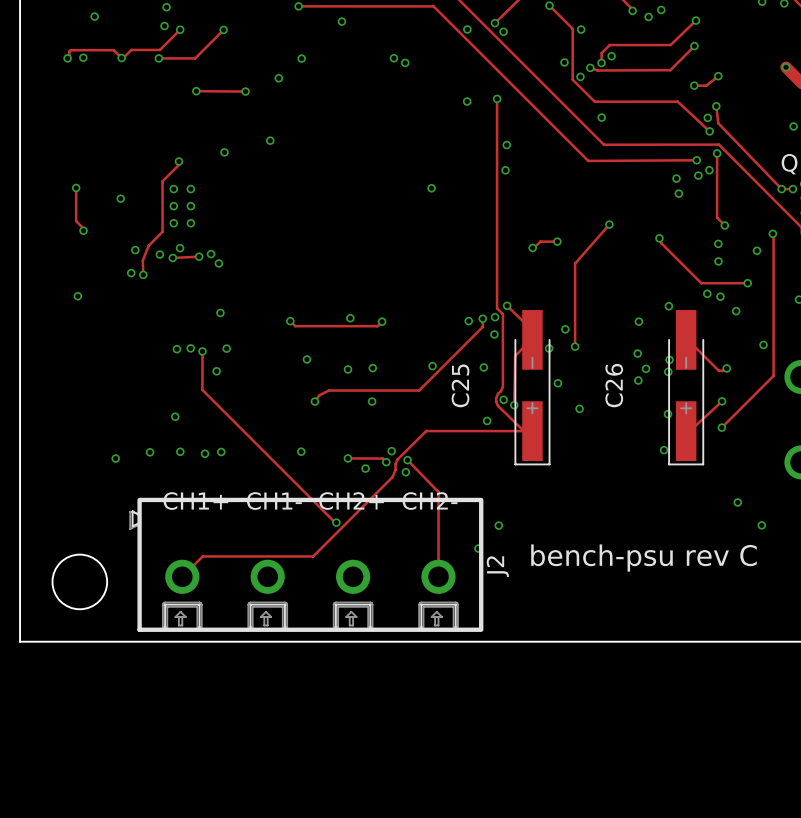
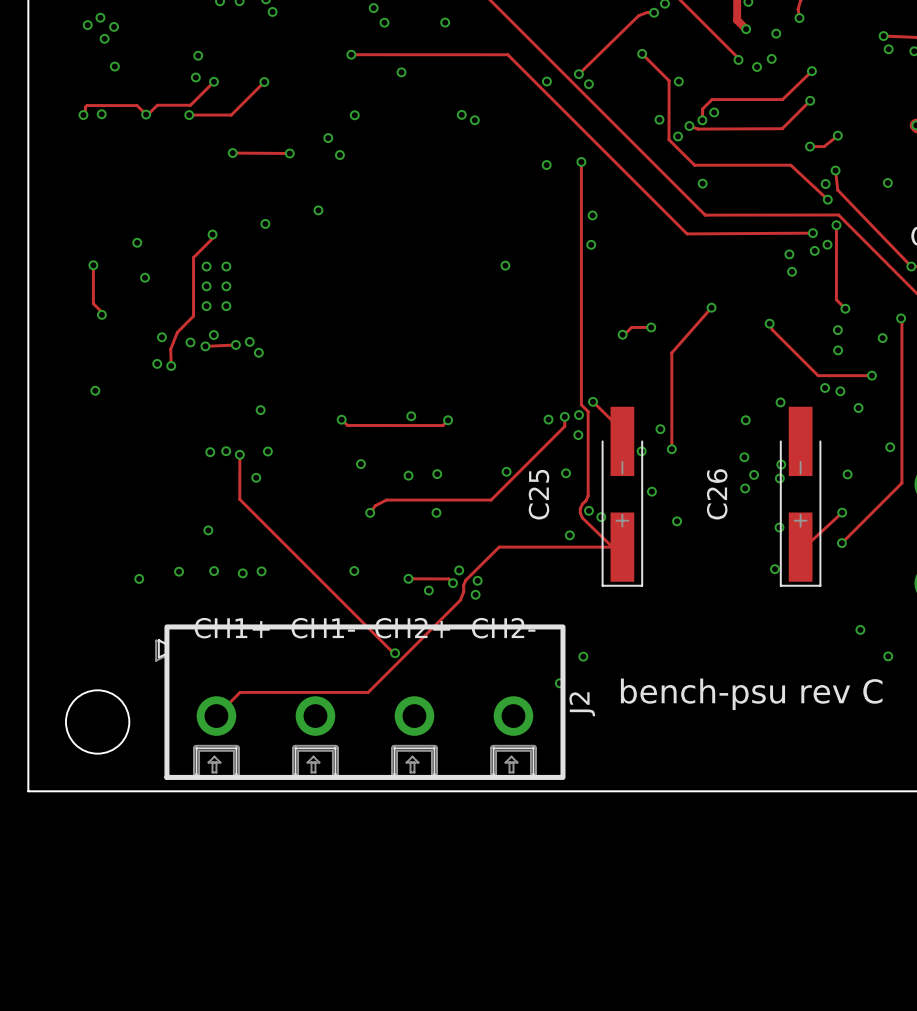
via: none -> (339, 155)
via: none -> (887, 182)
via: none -> (137, 242)
track: (523, 347) (515, 355) (514, 405) -> none
track: (695, 347) (718, 370) (726, 368) -> none
track: (407, 460) (438, 492) (438, 576) -> none

